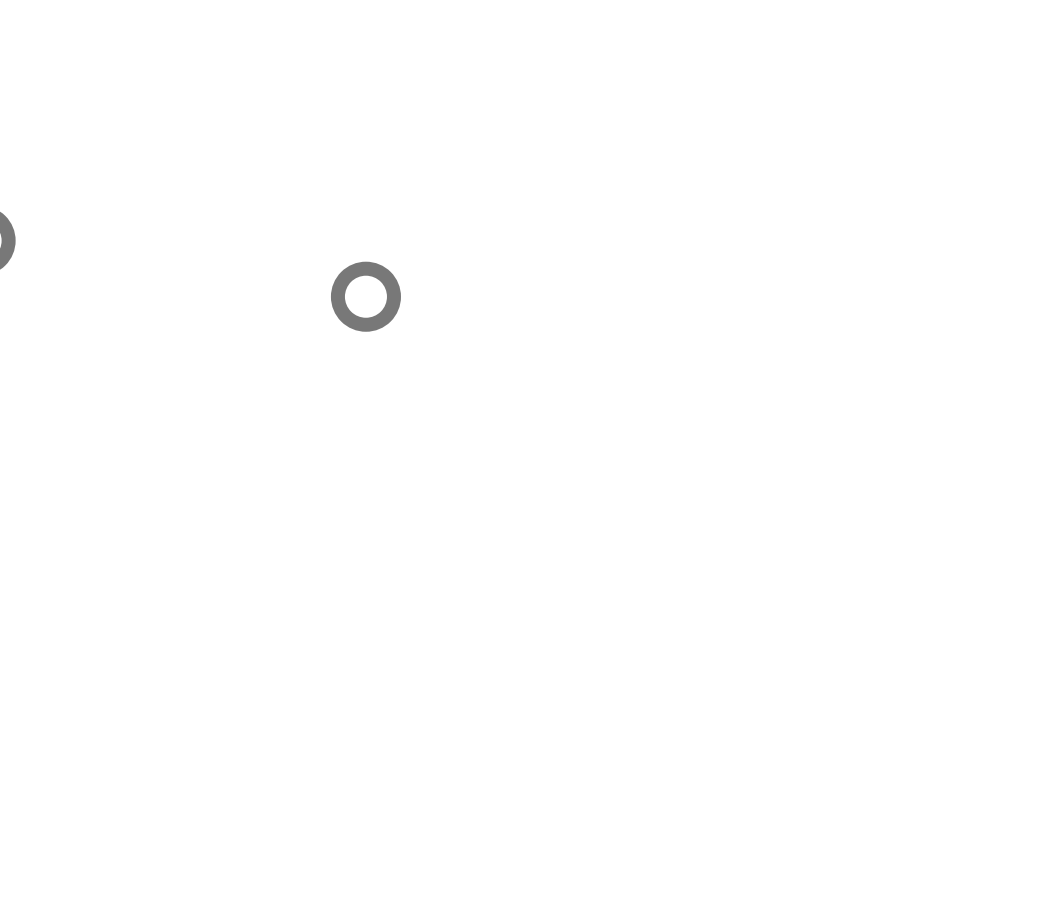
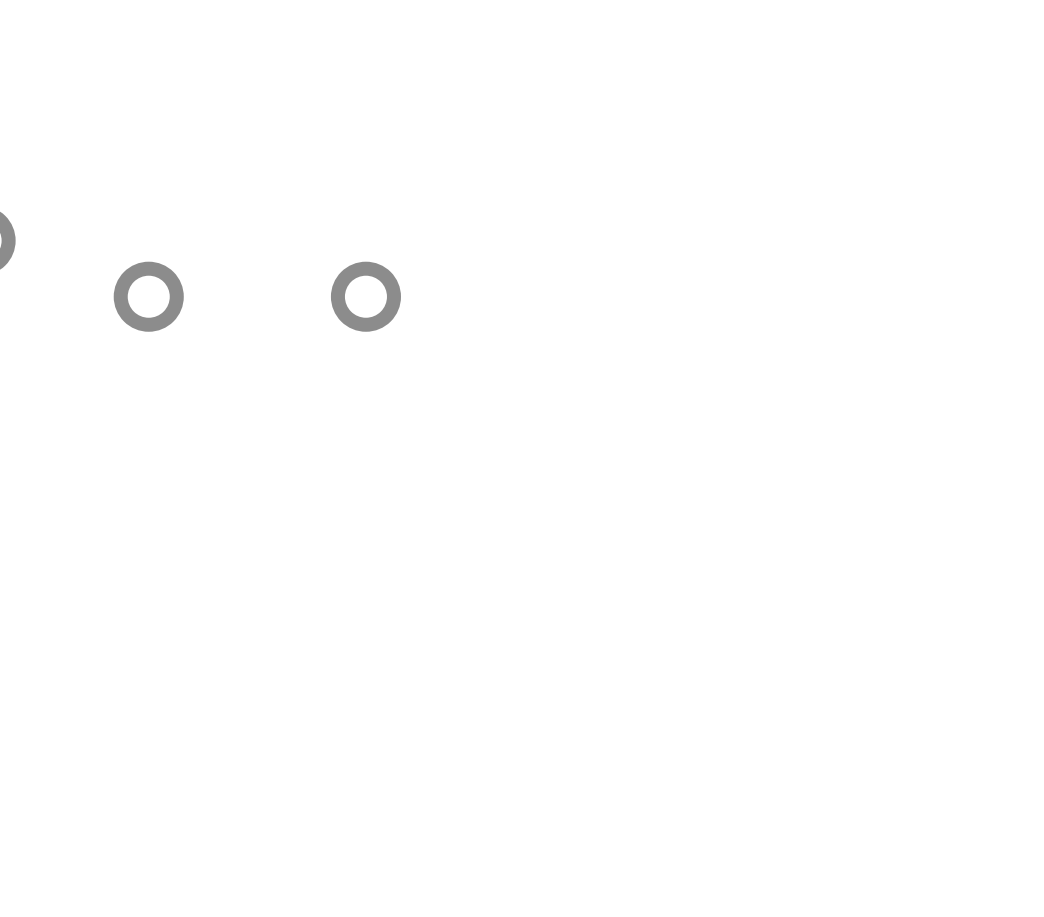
via: none -> (148, 296)

